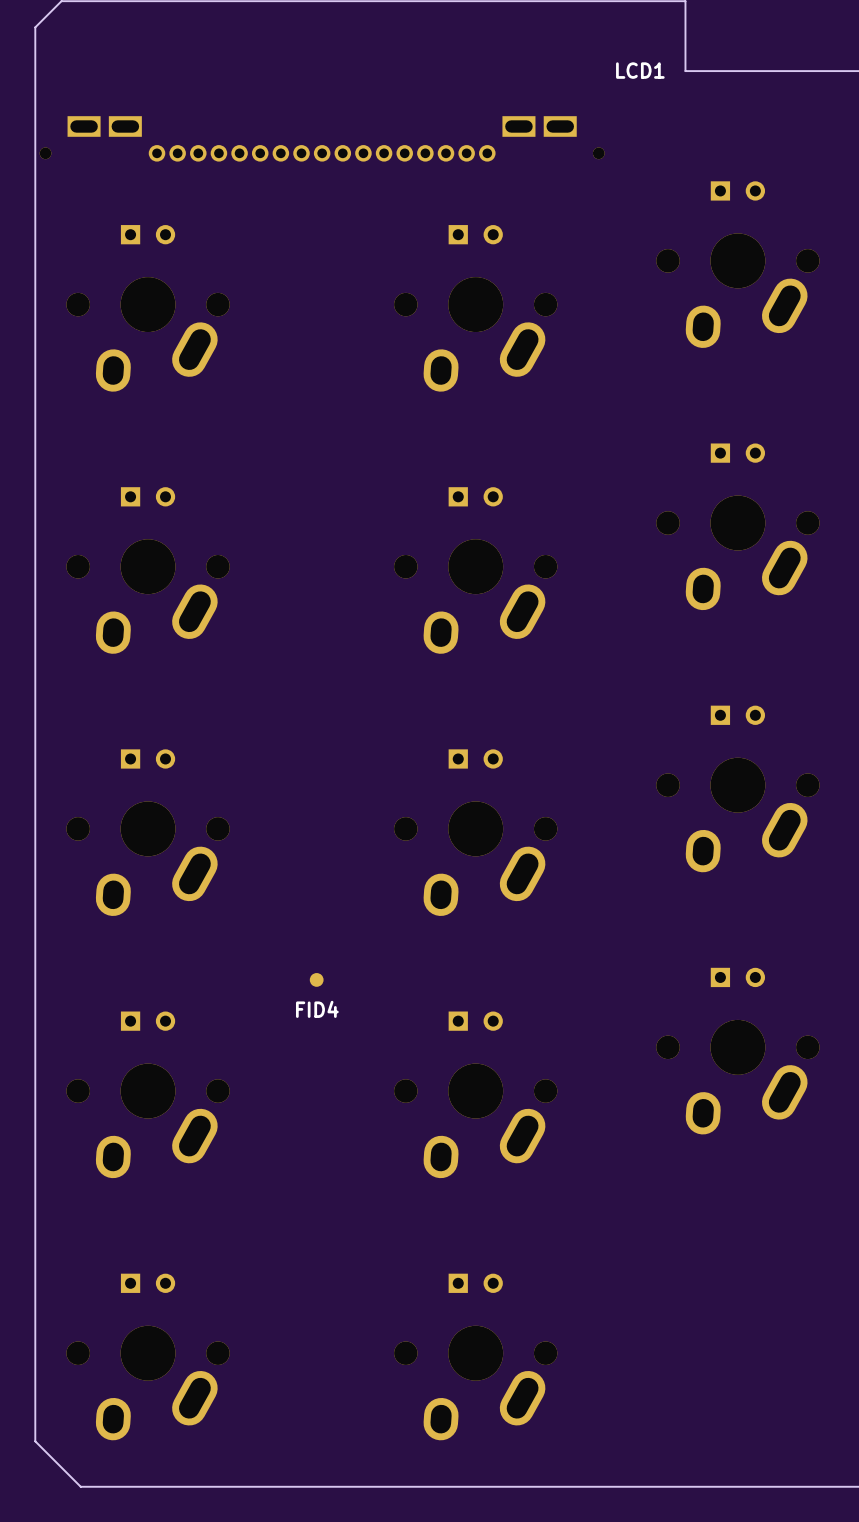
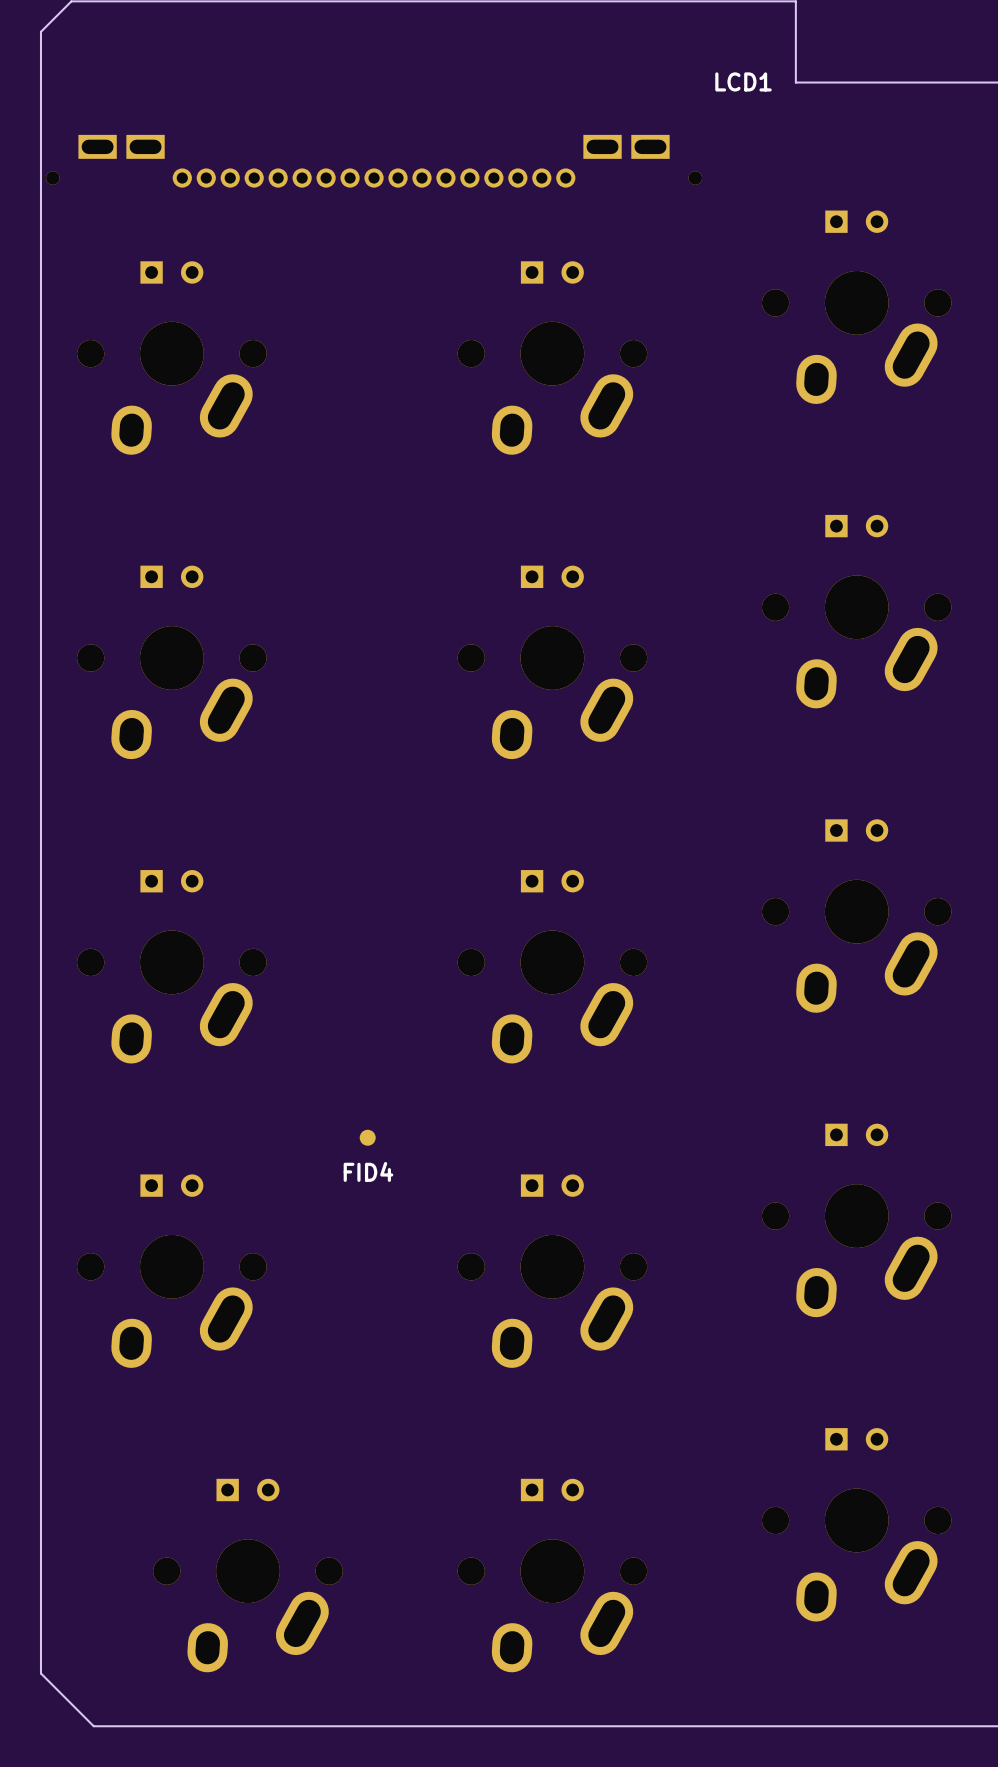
part: none -> (856, 1439)
part position: (148, 1283) -> (247, 1490)
part: none -> (856, 1555)
part position: (148, 1383) -> (247, 1605)

